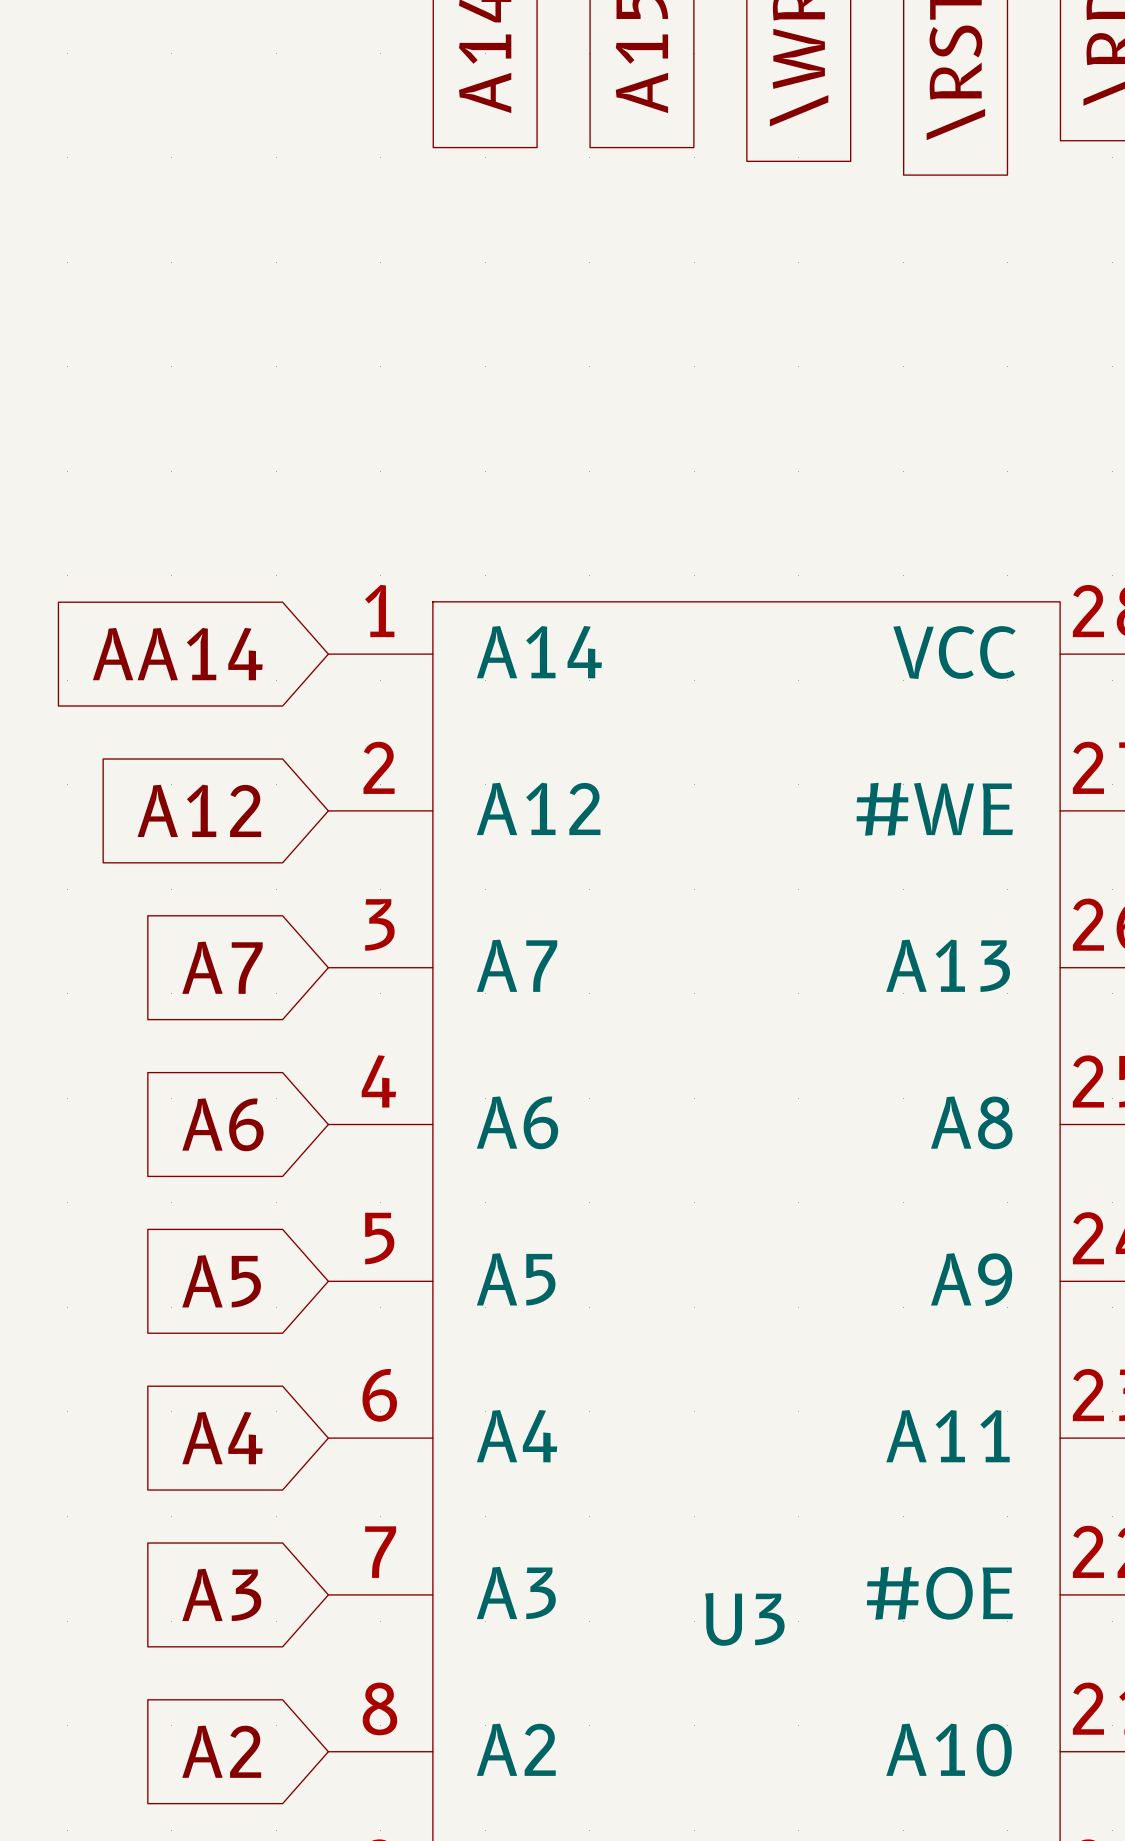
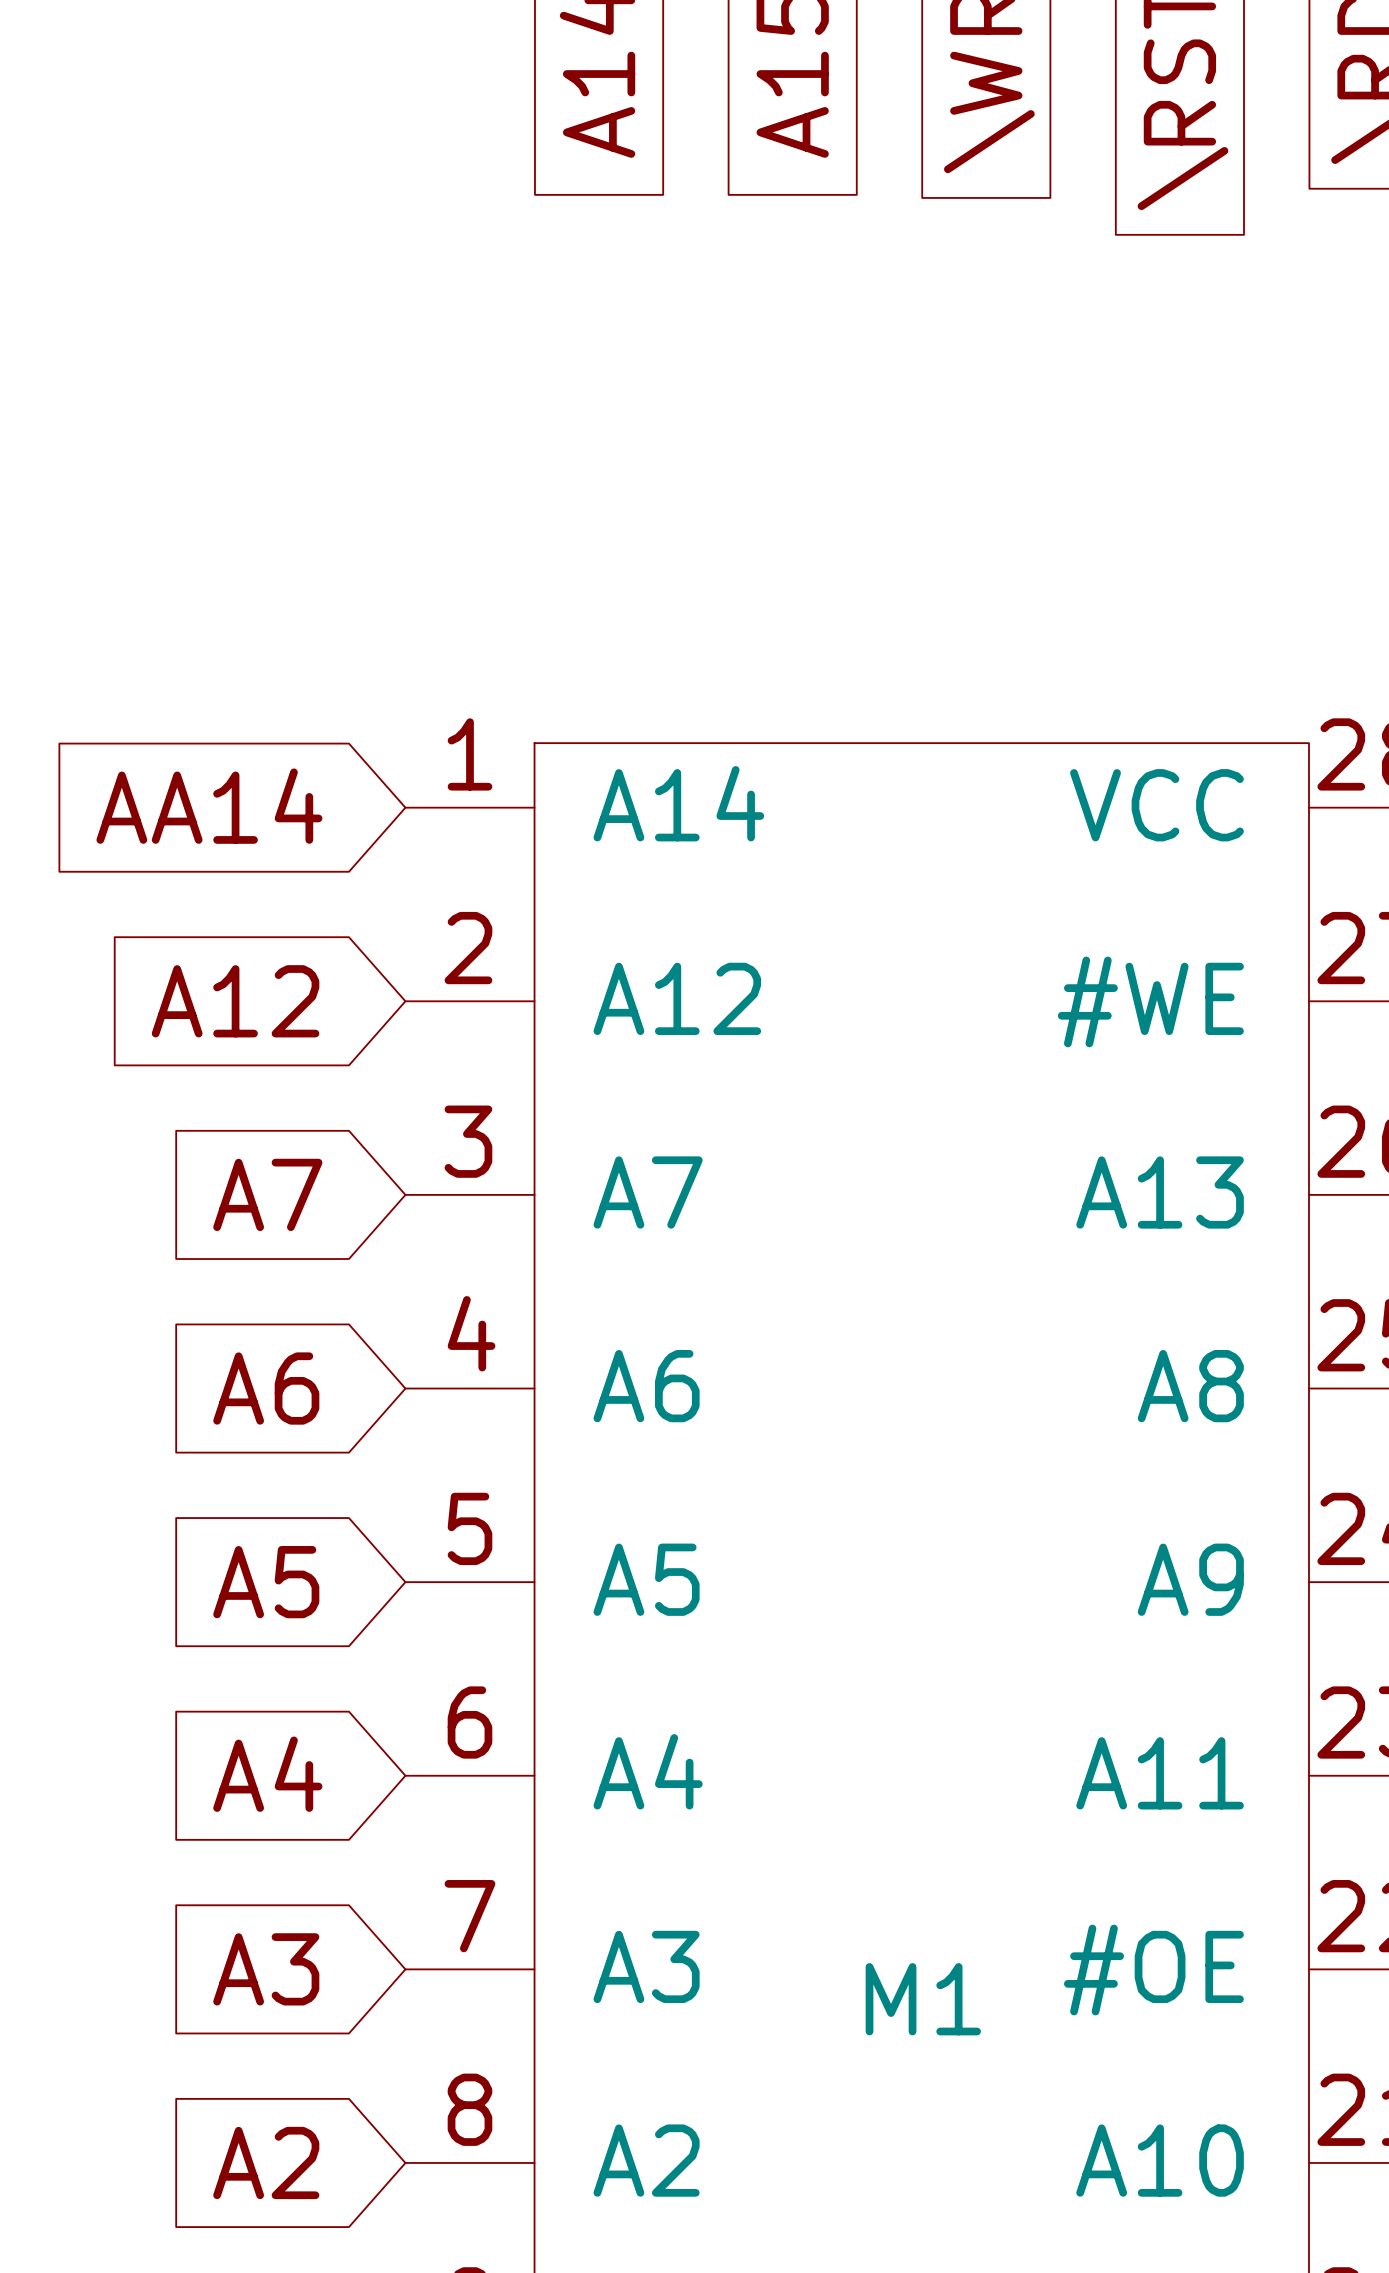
U3 name: U3 (744, 1619) -> M1 (923, 1999)

